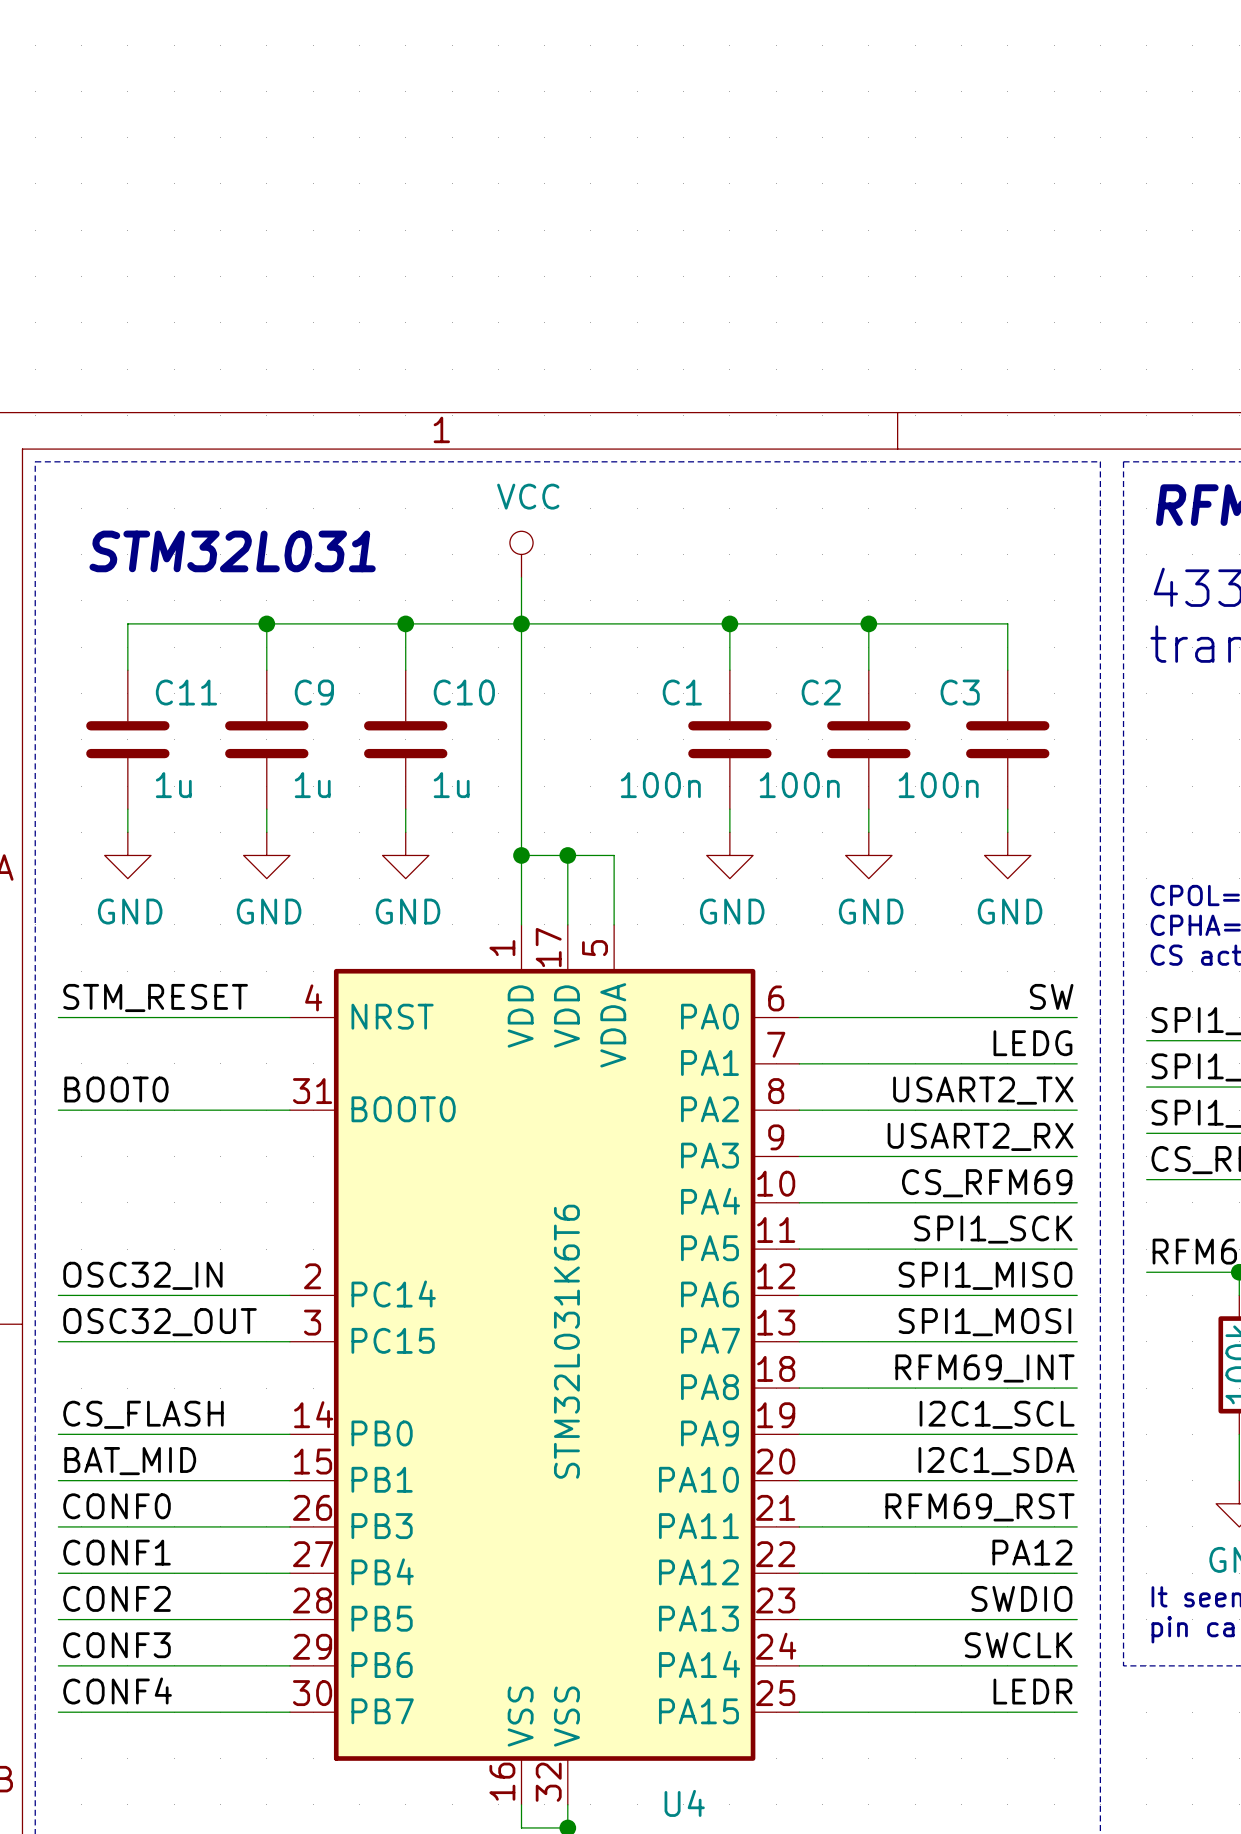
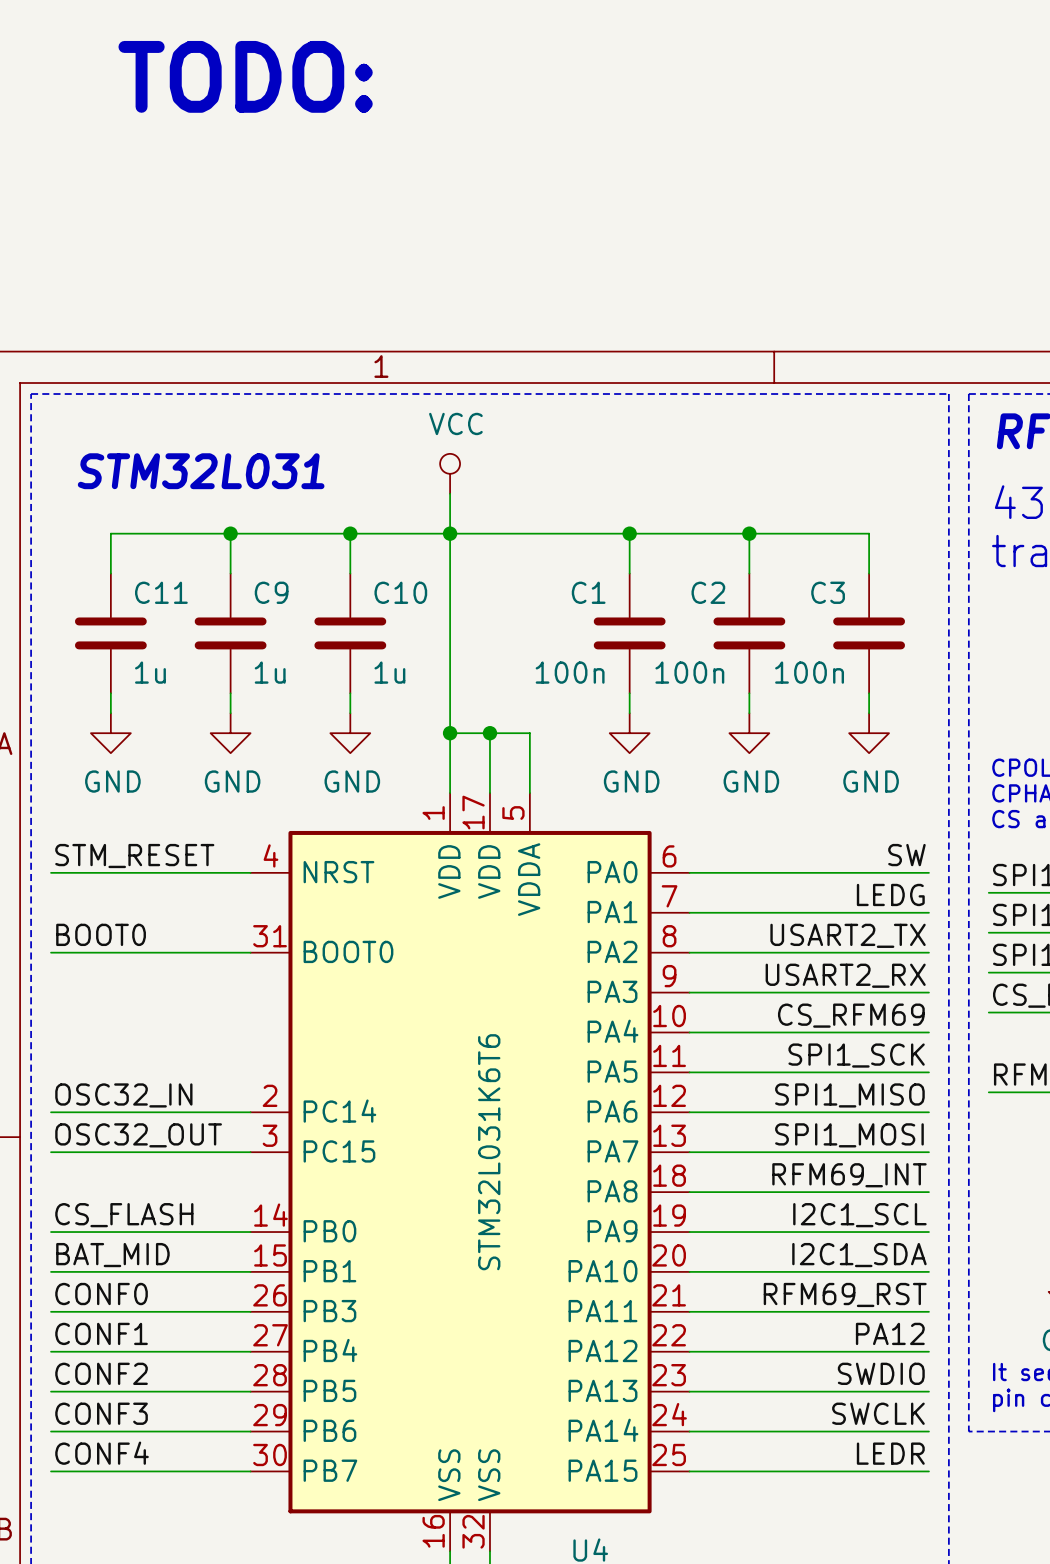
text: none -> TODO: (245, 76)

